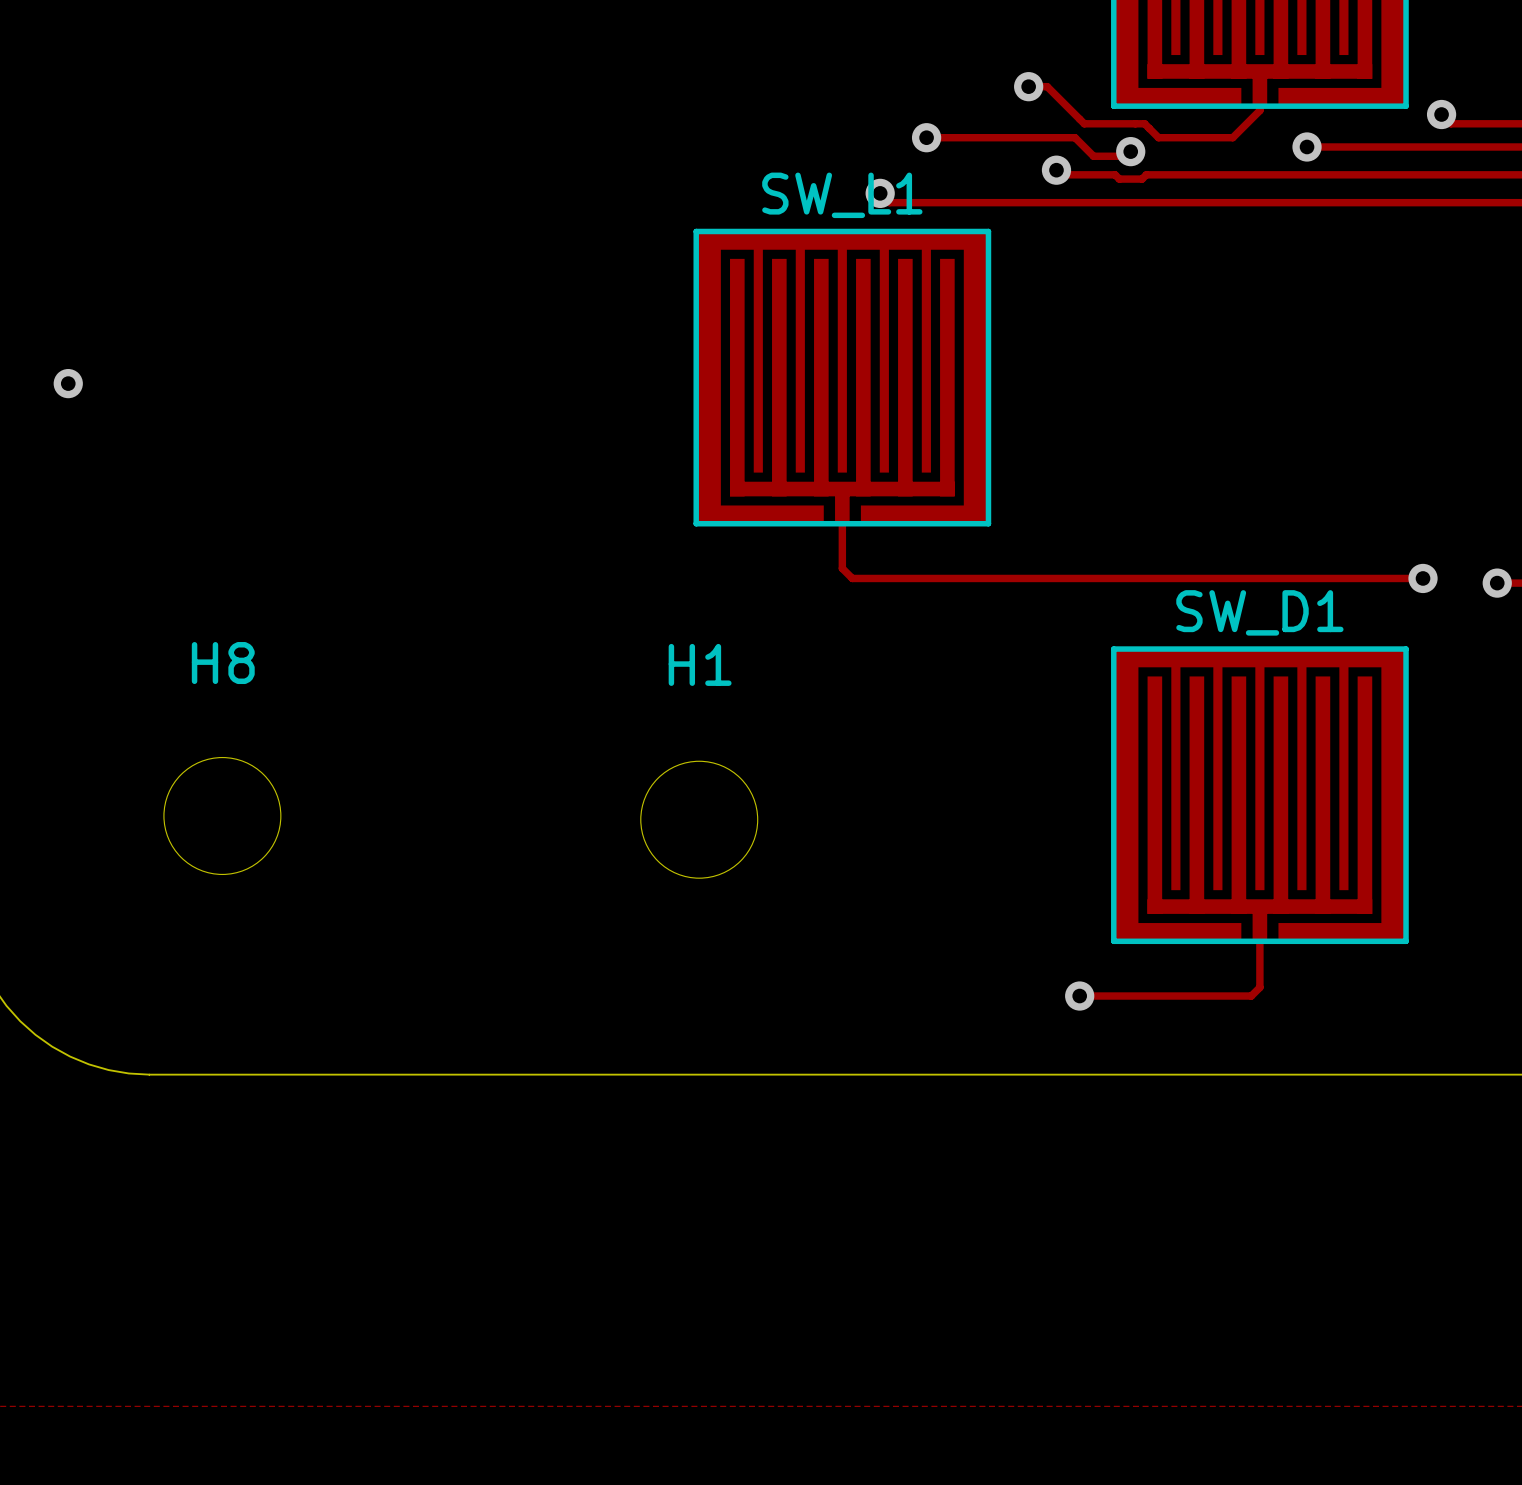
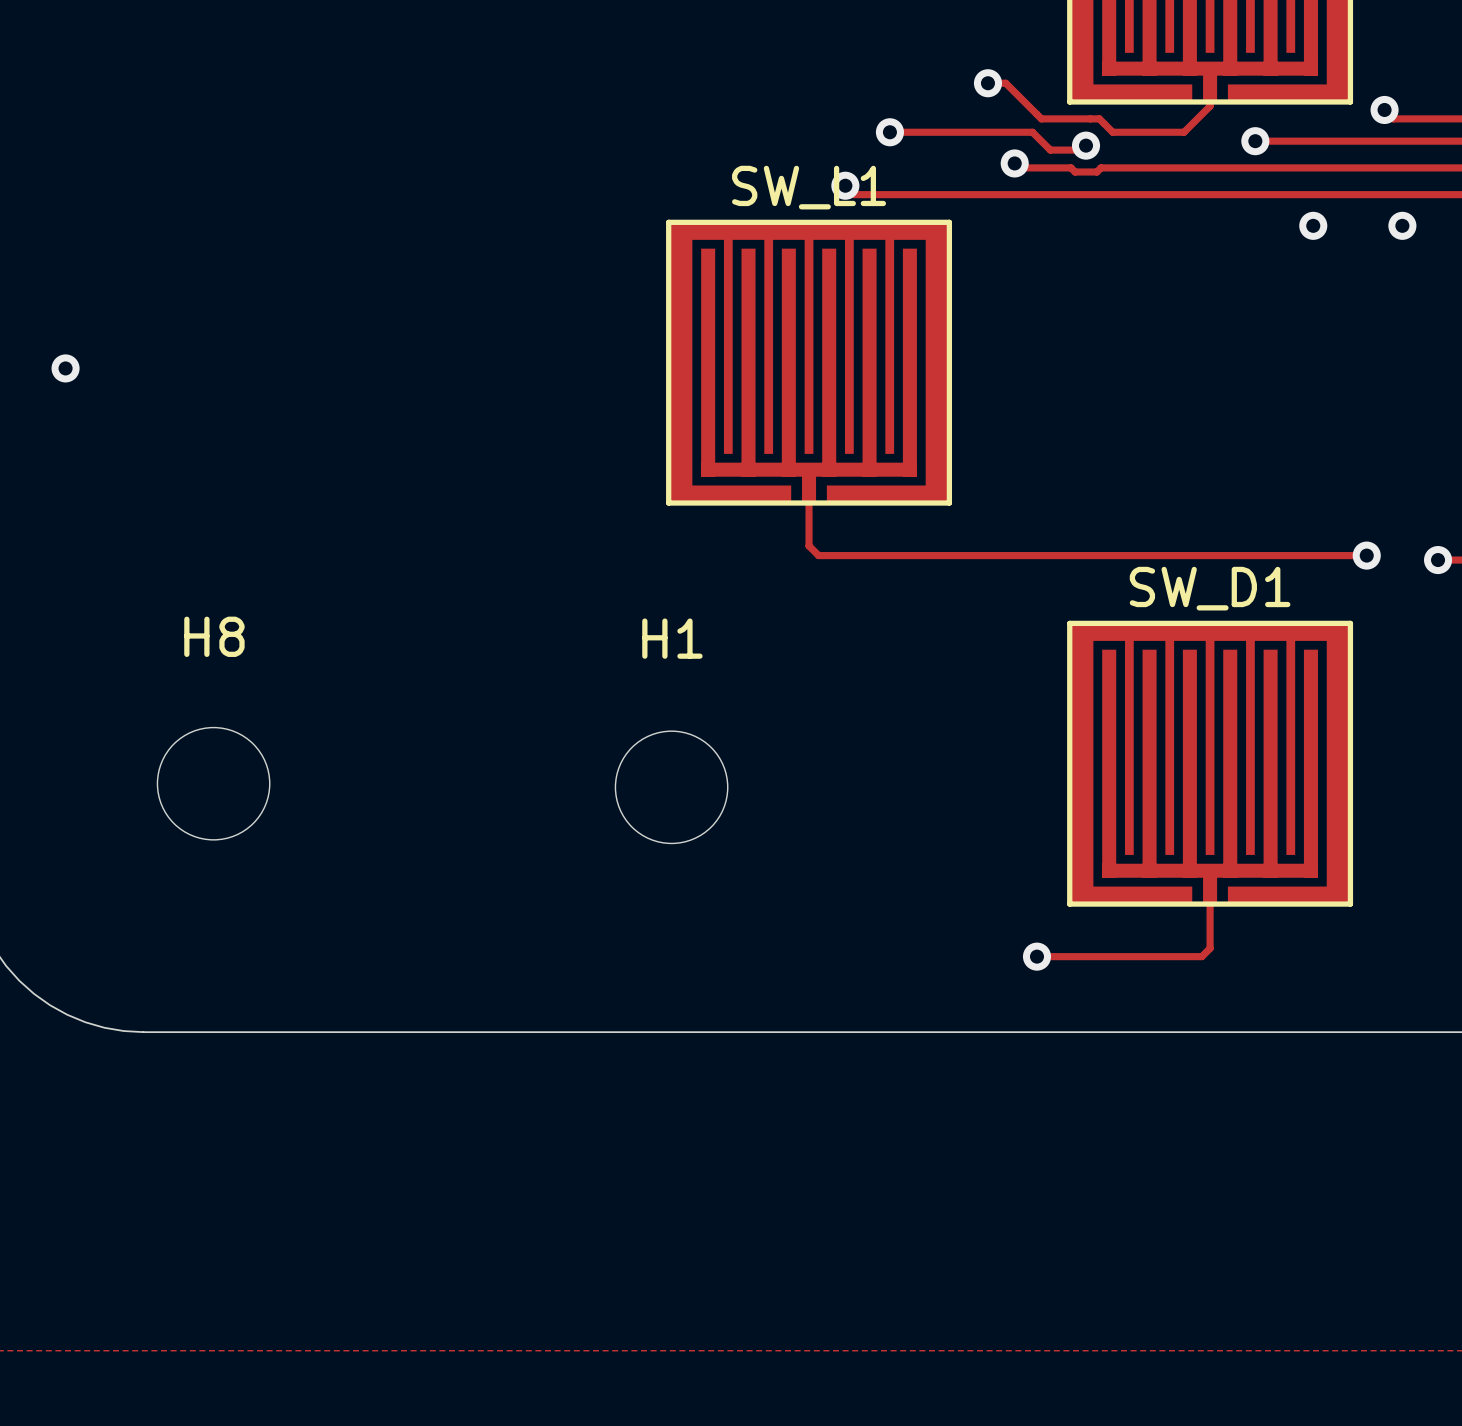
via: none -> (1313, 225)
via: none -> (1402, 225)

